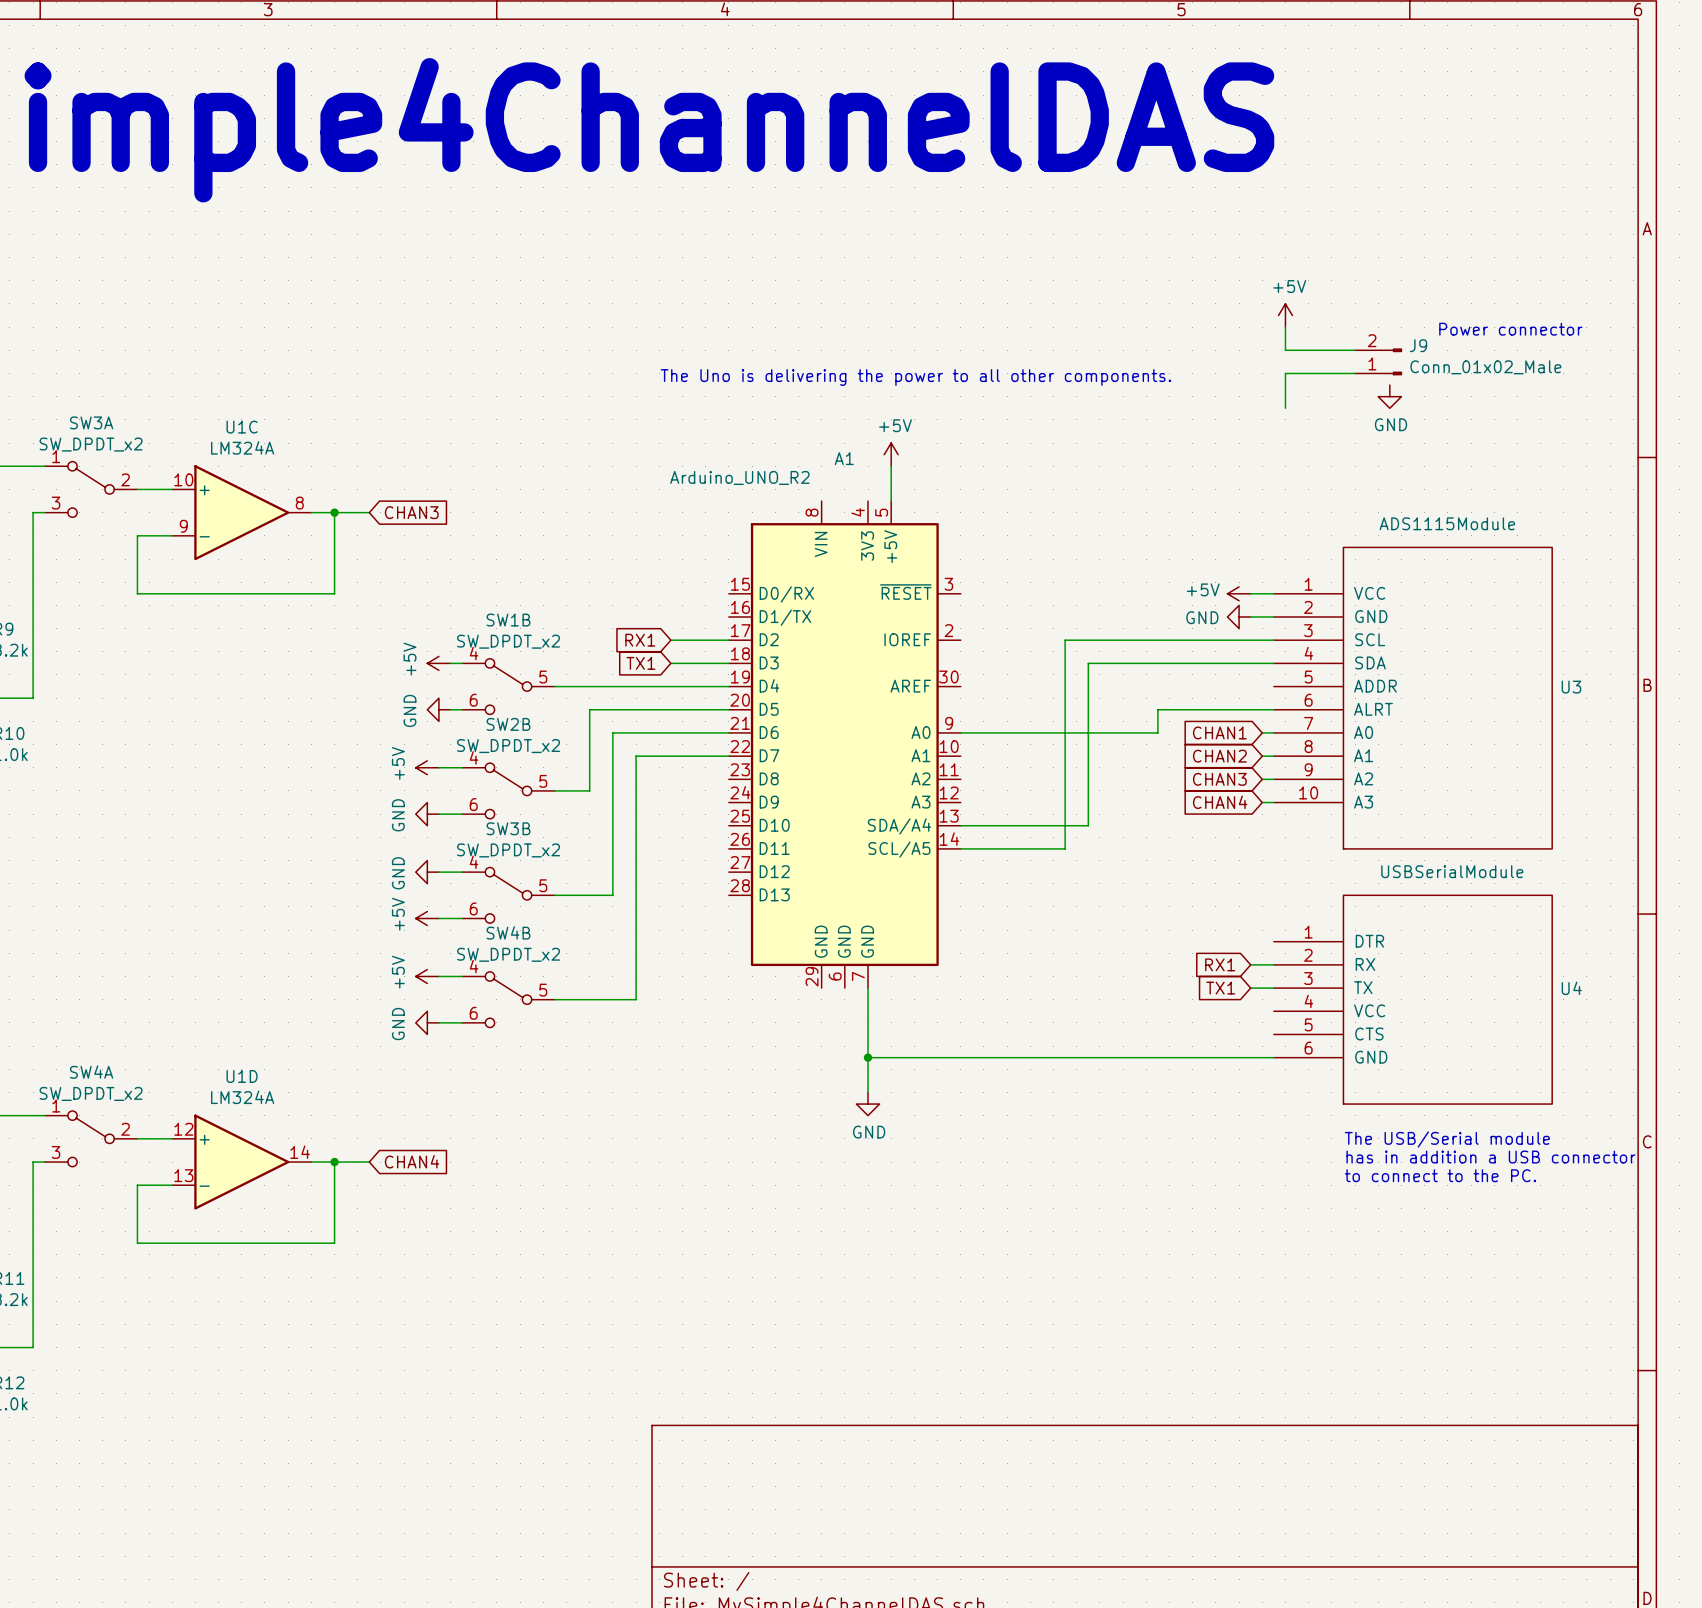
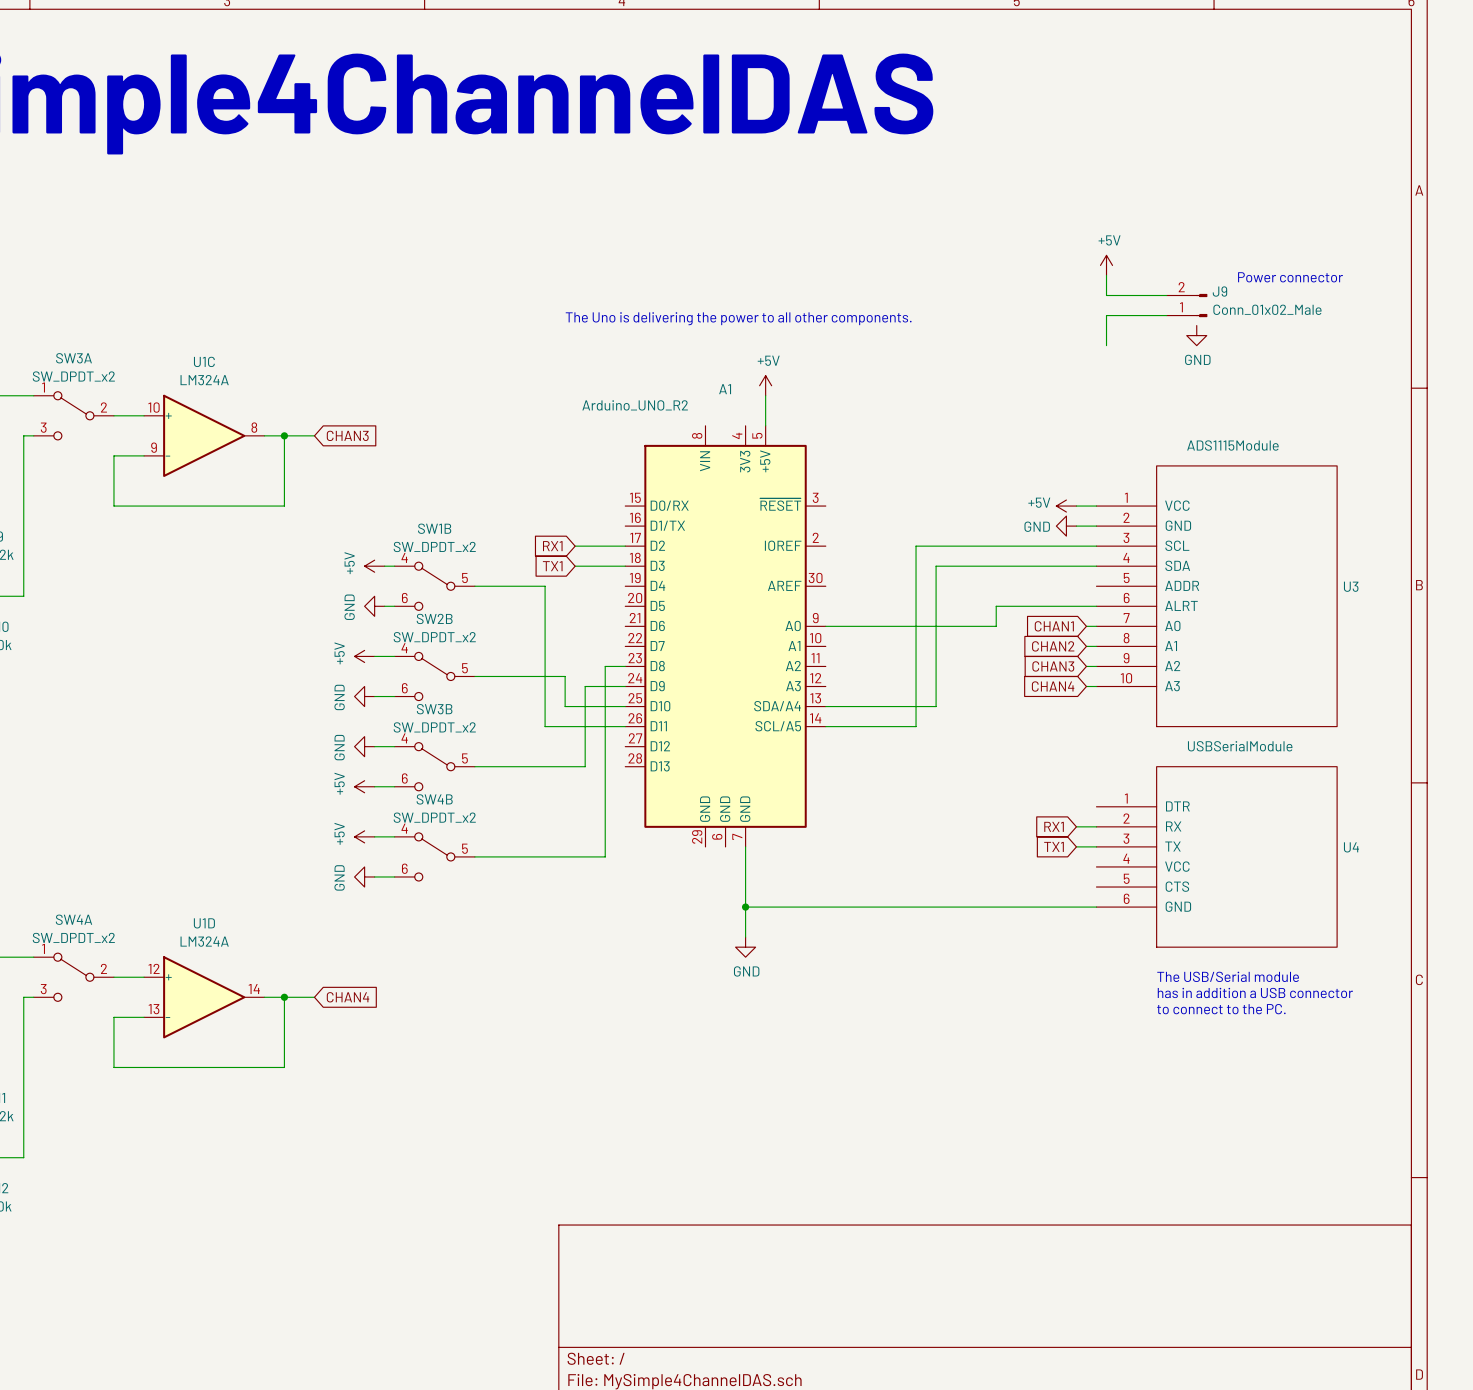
wire: (636, 686) (728, 686) -> (545, 586) (545, 646)
wire: (728, 709) (589, 709) (589, 790) -> (625, 706) (565, 706) (565, 676) (504, 676)
wire: (728, 732) (612, 732) (612, 895) -> (625, 686) (585, 686) (585, 766) (525, 766)
wire: (636, 756) (728, 756) -> (545, 726) (625, 726)
wire: (636, 848) (636, 999) -> (625, 666) (605, 666) (605, 856) (545, 856)

